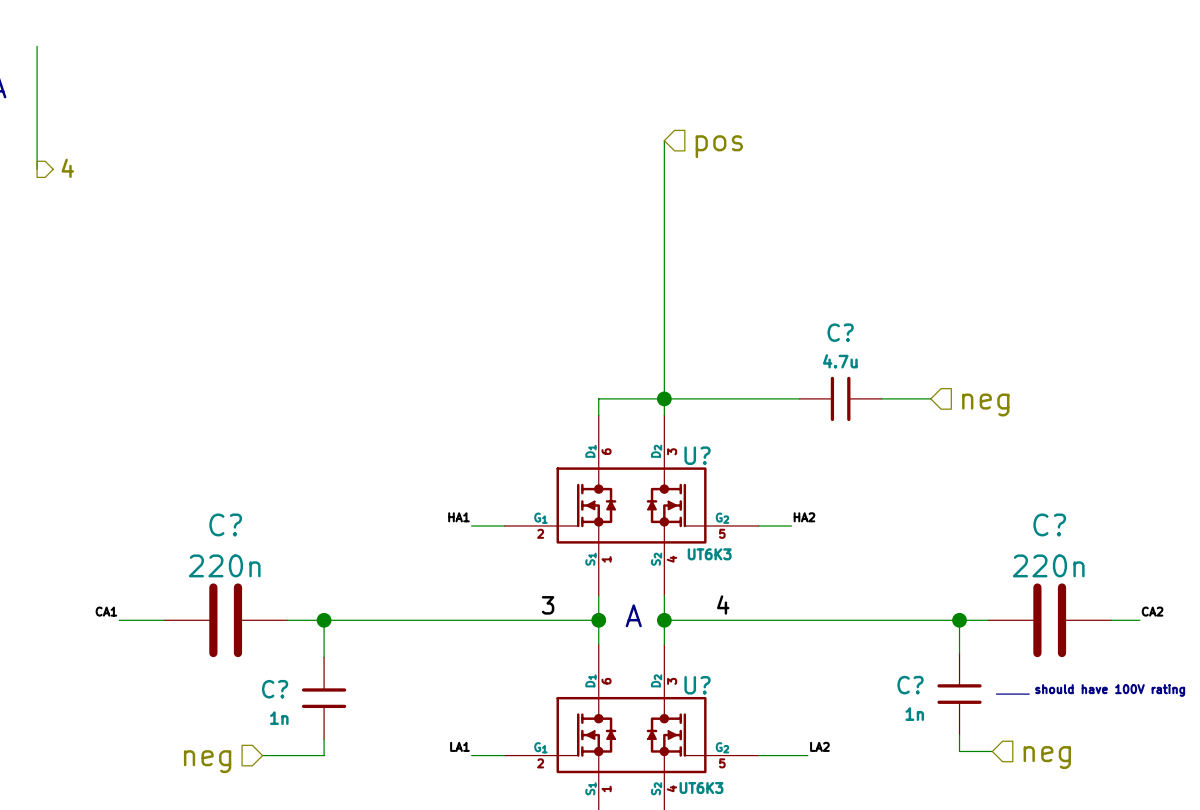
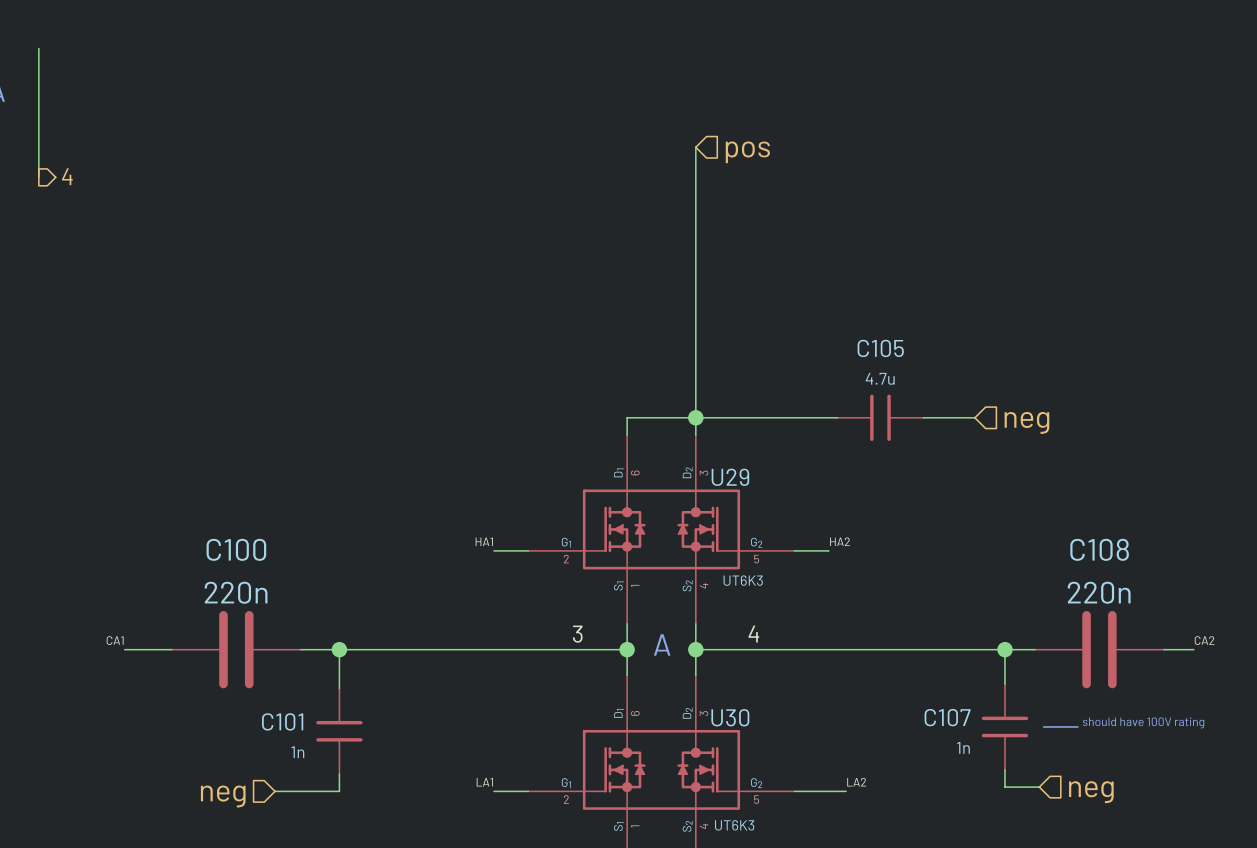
C? name: C? (840, 332) -> C105 (880, 348)
U? name: U? (697, 455) -> U29 (730, 477)
C? name: C? (225, 524) -> C100 (236, 549)
C? name: C? (1049, 524) -> C108 (1099, 549)
U? name: U? (697, 685) -> U30 (730, 717)
C? name: C? (910, 685) -> C107 (947, 717)
C? name: C? (275, 689) -> C101 (282, 721)

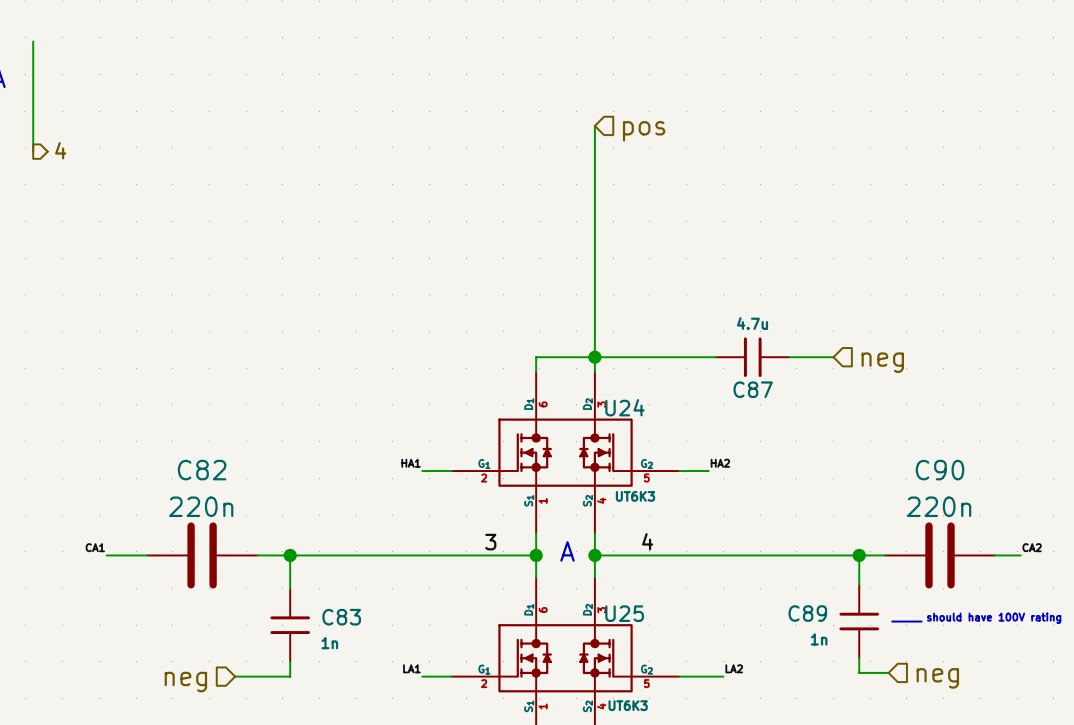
C105 name: C105 (880, 348) -> C87 (753, 389)
U29 name: U29 (730, 477) -> U24 (624, 407)
C100 name: C100 (236, 549) -> C82 (202, 470)
C108 name: C108 (1099, 549) -> C90 (939, 470)
U30 name: U30 (730, 717) -> U25 (624, 613)
C107 name: C107 (947, 717) -> C89 (807, 613)
C101 name: C101 (282, 721) -> C83 (341, 617)
C101 value position: 1n (297, 752) -> 1n (329, 643)

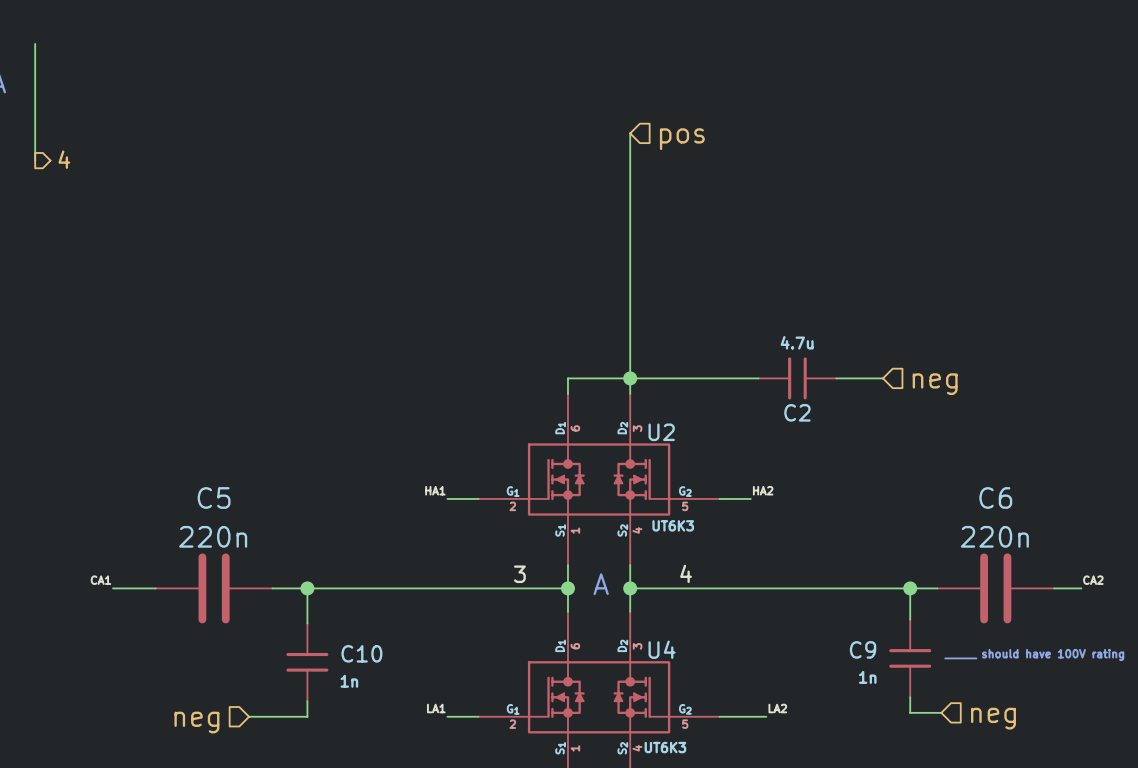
C87 name: C87 (753, 389) -> C2 (797, 412)
U24 name: U24 (624, 407) -> U2 (661, 432)
C82 name: C82 (202, 470) -> C5 (214, 497)
C90 name: C90 (939, 470) -> C6 (995, 497)
U25 name: U25 (624, 613) -> U4 (662, 649)
C89 name: C89 (807, 613) -> C9 (863, 649)
C83 name: C83 (341, 617) -> C10 (361, 653)

